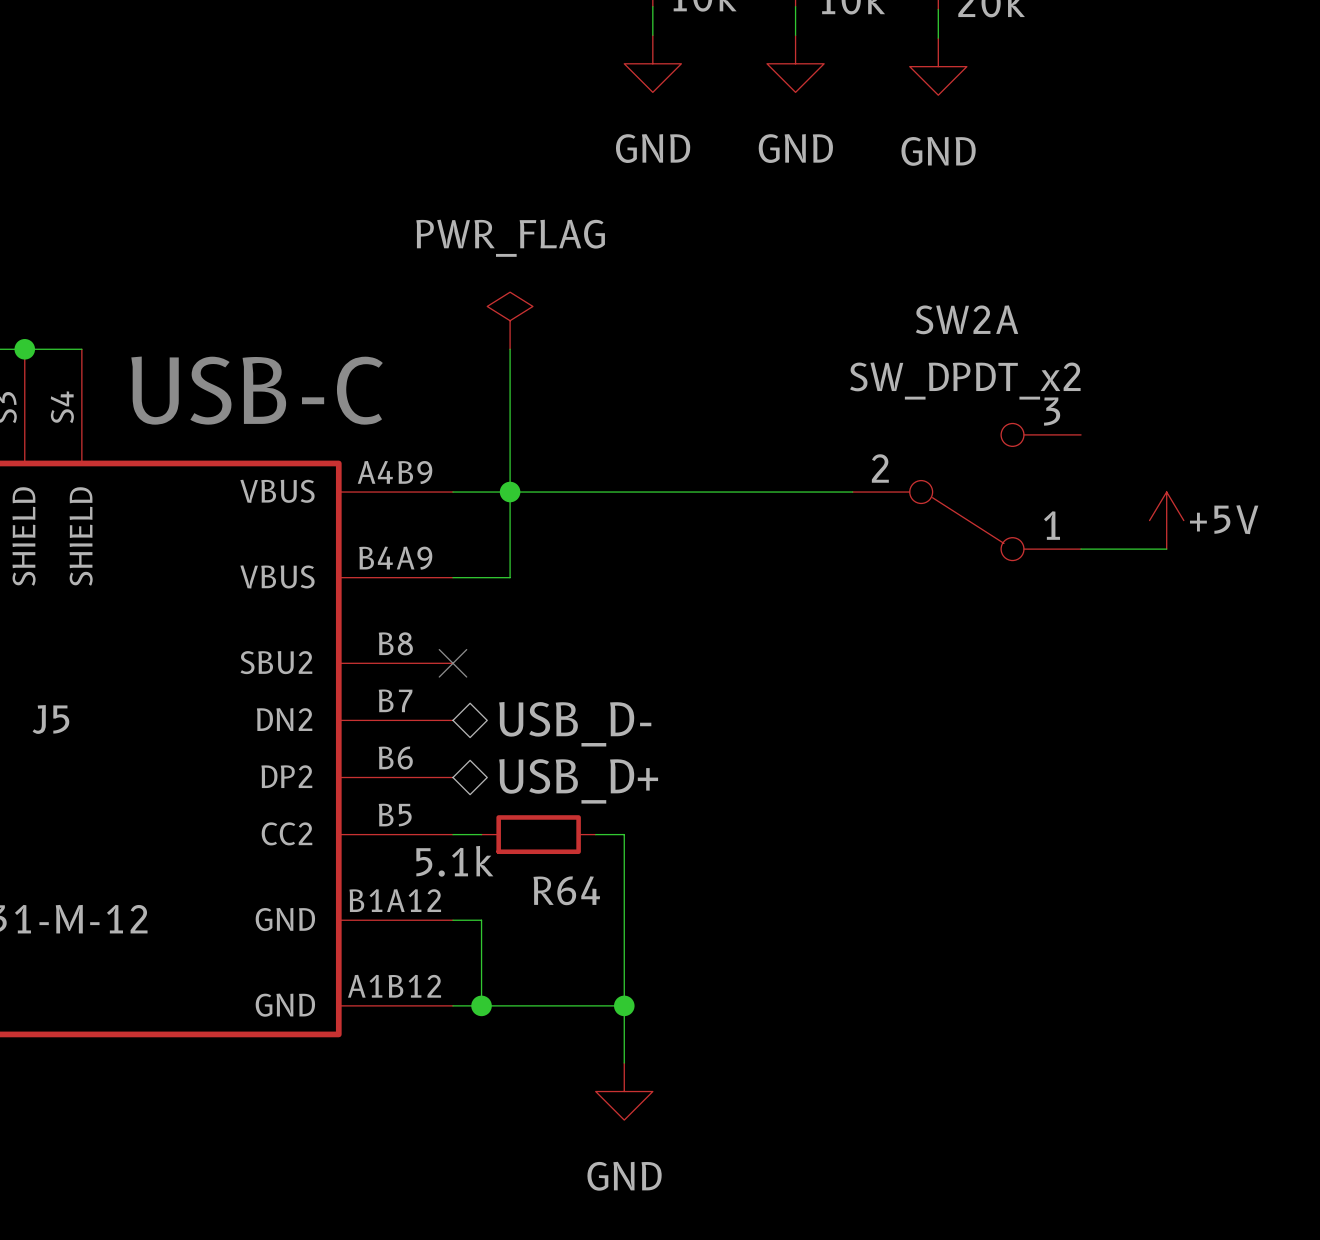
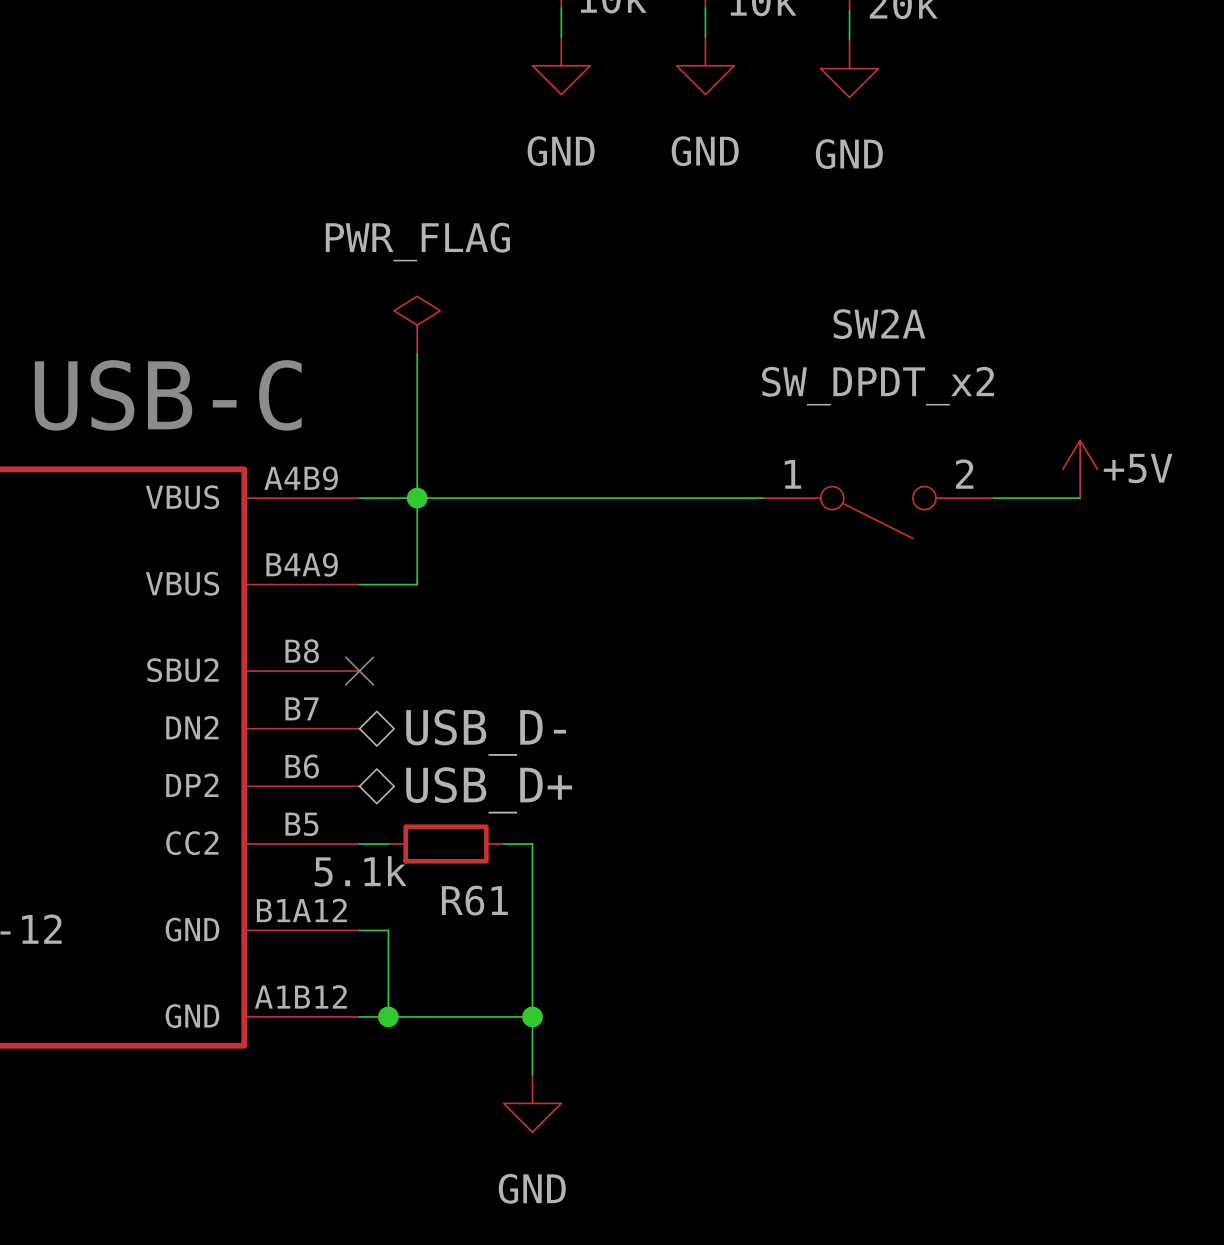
SW2A symbol: [852, 423, 1082, 561] -> [763, 486, 994, 539]
power symbol position: +5V (1166, 520) -> +5V (1080, 469)
wire: (1081, 549) (1166, 549) -> (993, 498) (1080, 498)
R64 name: R64 (566, 890) -> R61 (474, 900)

